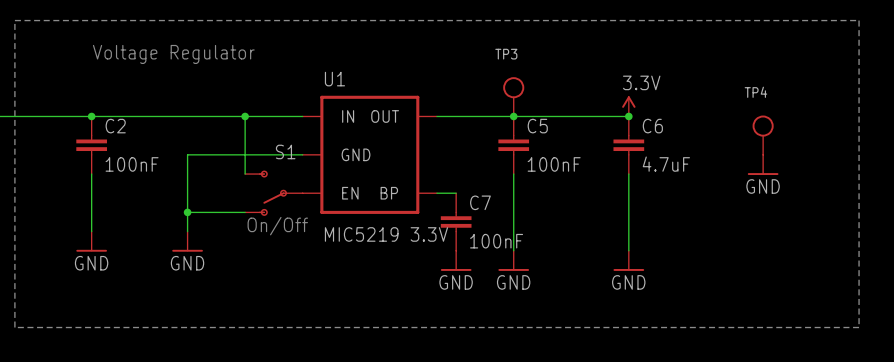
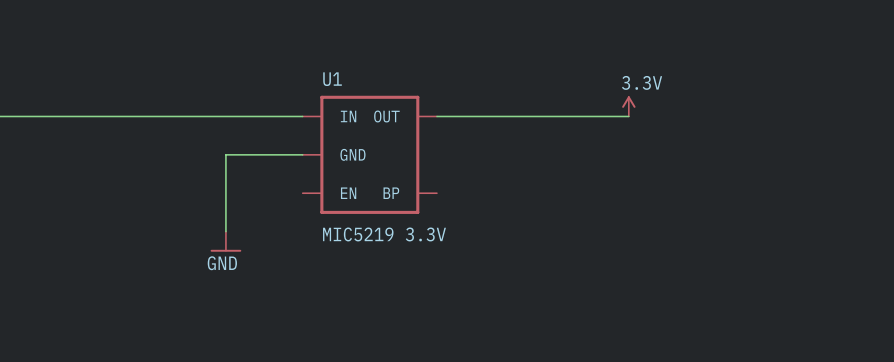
line: (14, 20) (859, 20) (859, 327) (14, 327) (14, 20) -> none
text: Voltage Regulator (173, 54) -> none
TP3: (513, 96) -> none
junction: (91, 116) -> none
wire: (245, 116) (245, 174) -> none
junction: (245, 116) -> none
junction: (513, 116) -> none
junction: (628, 116) -> none
TP4: (763, 135) -> none
C2: 100nF (91, 145) -> none
C5: 100nF (513, 145) -> none
C6: 4.7uF (628, 145) -> none
wire: (225, 154) (187, 154) (187, 231) -> (225, 154) (225, 231)
power symbol: GND (763, 164) -> none
wire: (91, 174) (91, 231) -> none
wire: (513, 174) (513, 250) -> none
wire: (628, 174) (628, 250) -> none
S1: (273, 193) -> none
wire: (436, 193) (456, 193) -> none
wire: (187, 212) (245, 212) -> none
junction: (187, 212) -> none
C7: 100nF (456, 222) -> none
text: On/Off (277, 226) -> none
power symbol: GND (91, 241) -> none
power symbol position: GND (187, 241) -> GND (225, 241)
power symbol: GND (456, 260) -> none
power symbol: GND (513, 260) -> none
power symbol: GND (628, 260) -> none

